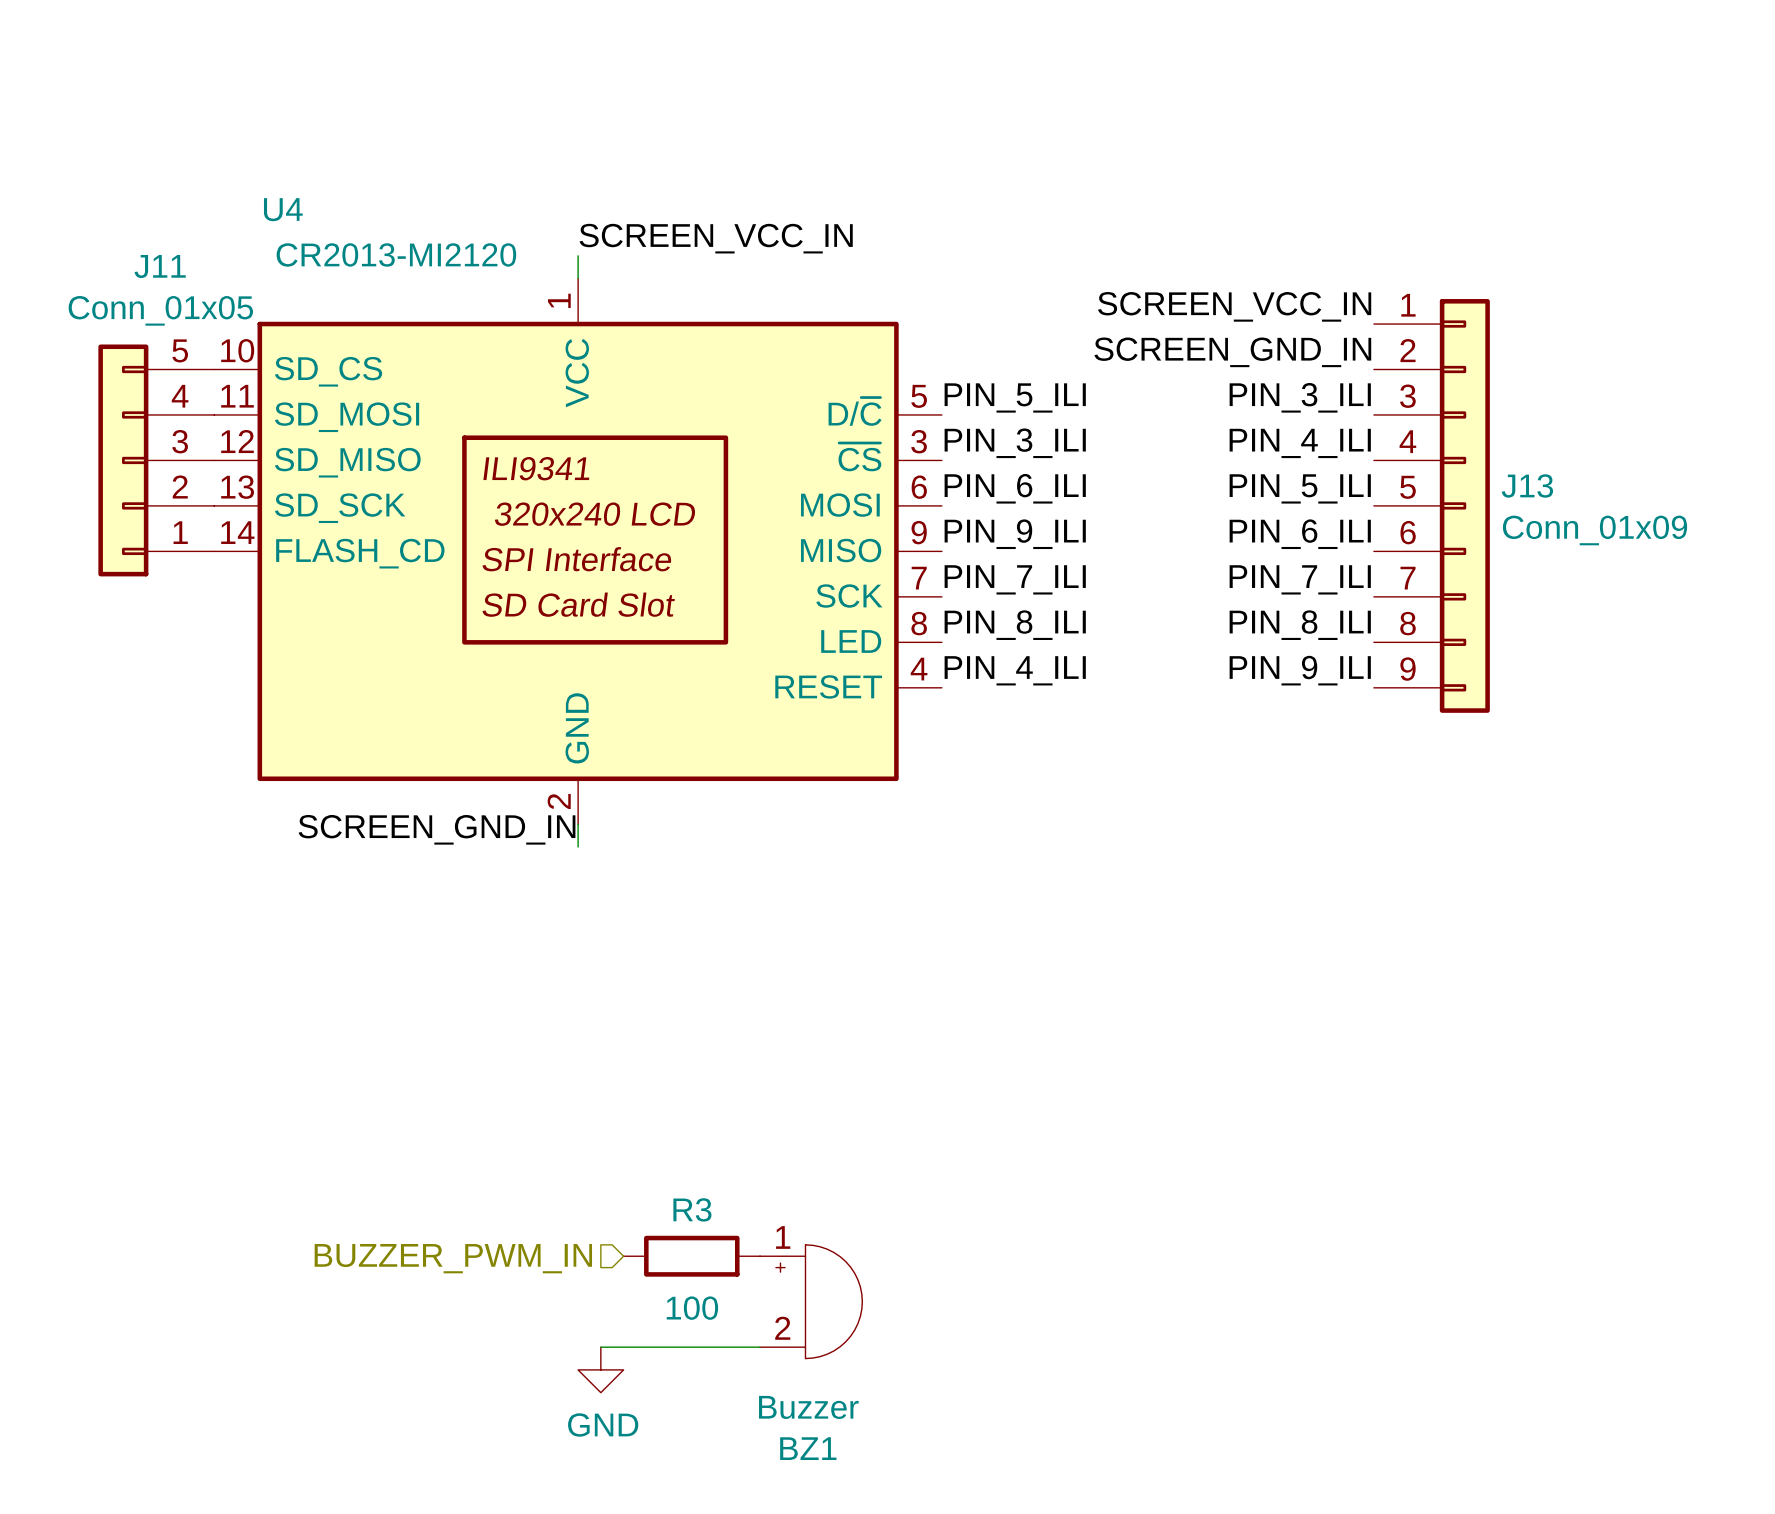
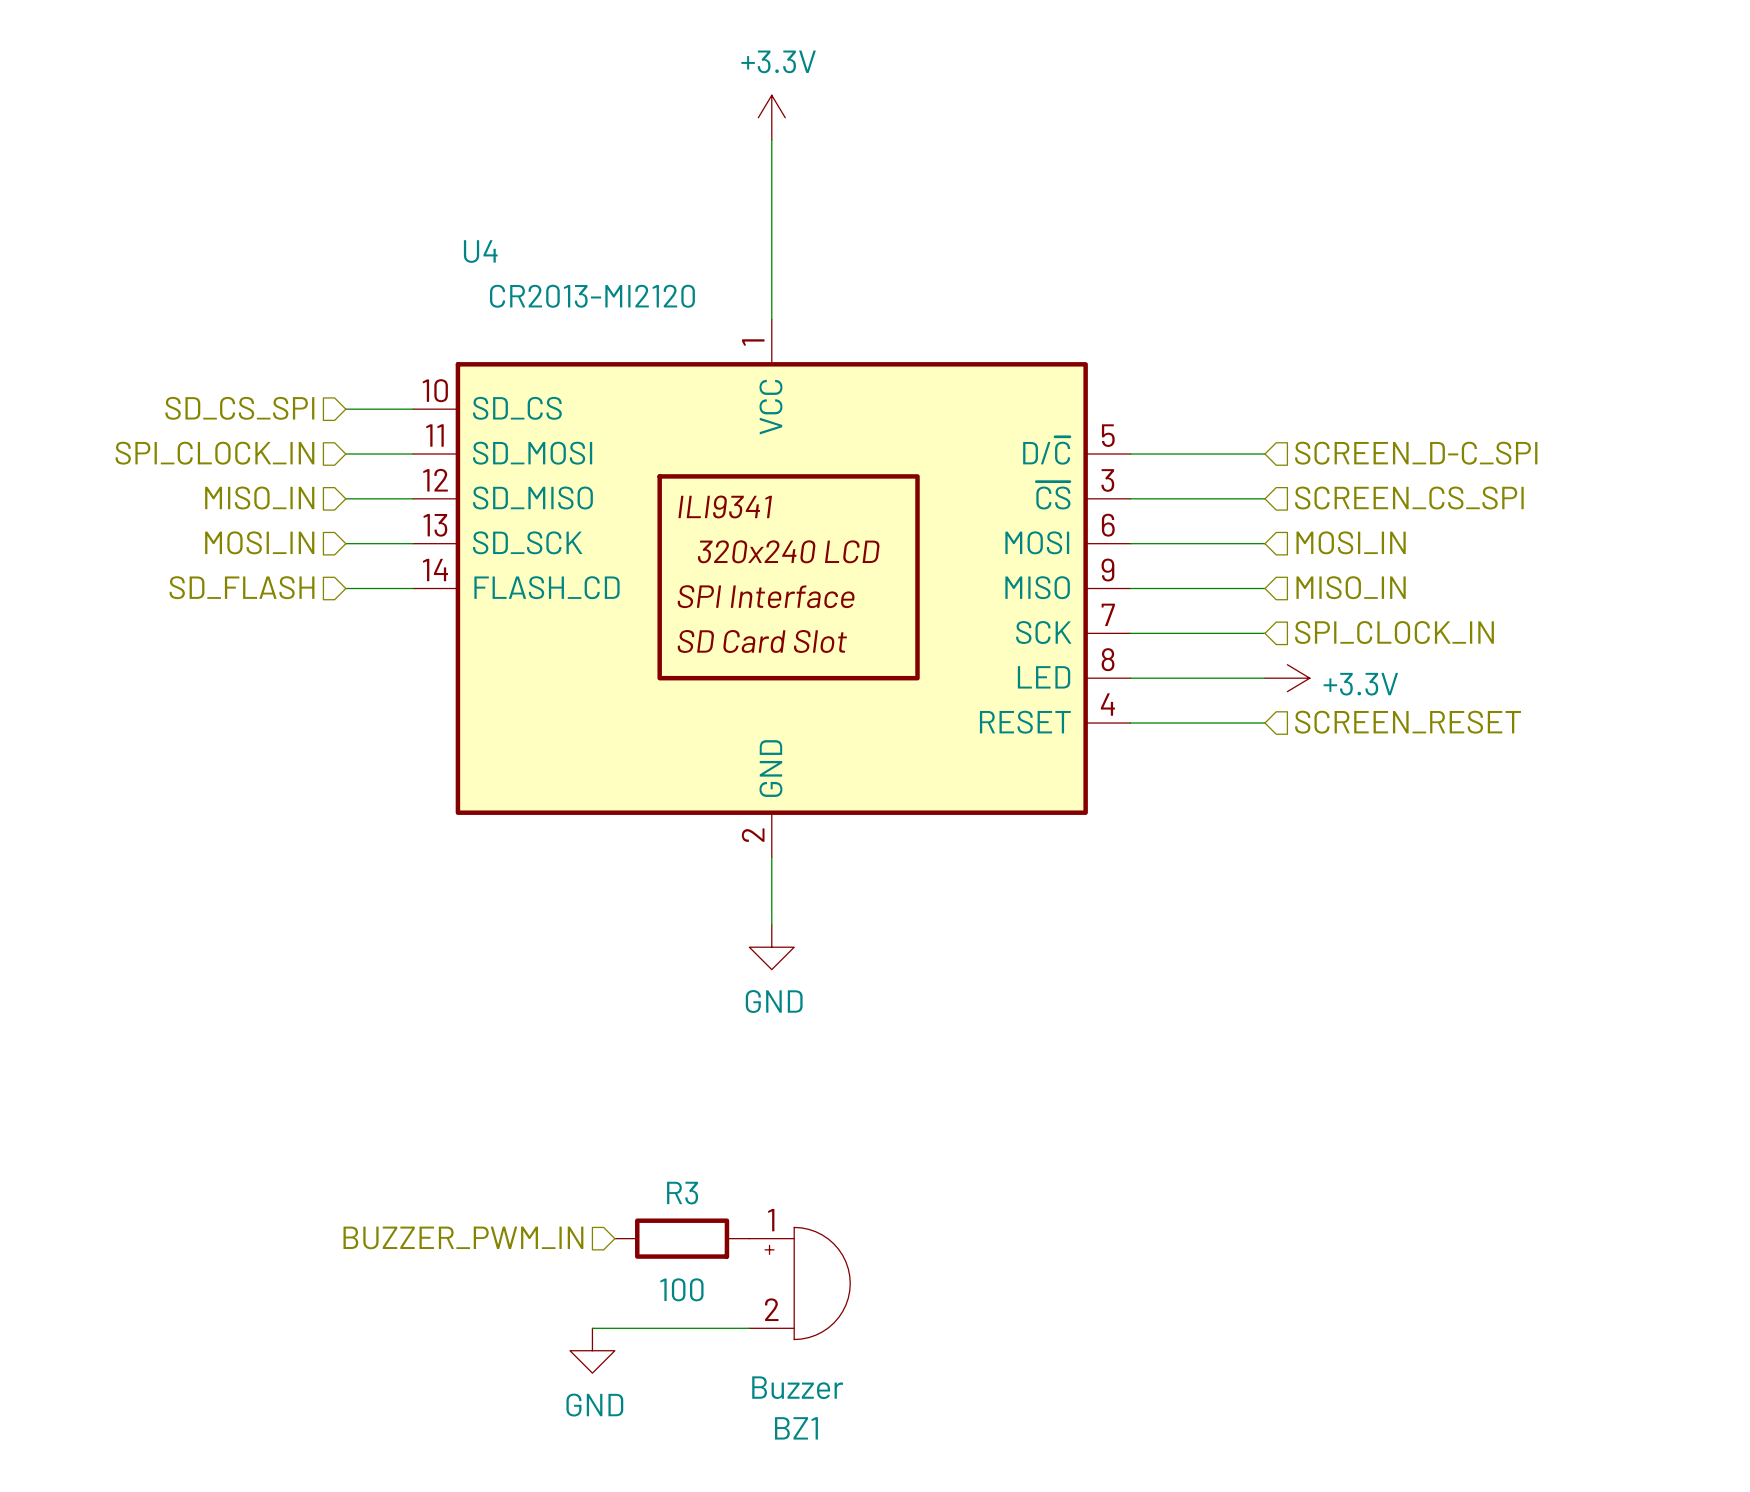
power symbol: none -> +3.3V (771, 117)
wire: none -> (771, 140) (771, 319)
label: SCREEN_VCC_IN (716, 238) -> none
wire: (578, 255) (578, 278) -> none
label: SCREEN_VCC_IN (1234, 306) -> none
label: SCREEN_GND_IN (1232, 352) -> none
label: PIN_5_ILI (1015, 397) -> none
label: PIN_3_ILI (1300, 397) -> none
hierarchical label: none -> SD_CS_SPI (239, 408)
label: PIN_3_ILI (1015, 443) -> none
label: PIN_4_ILI (1300, 443) -> none
J11: Conn_01x05 (156, 460) -> none
wire: none -> (1130, 454) (1264, 454)
hierarchical label: none -> SPI_CLOCK_IN (214, 453)
hierarchical label: none -> SCREEN_D-C_SPI (1416, 453)
label: PIN_6_ILI (1015, 488) -> none
label: PIN_5_ILI (1300, 488) -> none
wire: none -> (1130, 498) (1264, 498)
J13: Conn_01x09 (1431, 505) -> none
hierarchical label: none -> MISO_IN (259, 498)
hierarchical label: none -> SCREEN_CS_SPI (1409, 498)
label: PIN_9_ILI (1015, 534) -> none
label: PIN_6_ILI (1300, 534) -> none
U4 position: (578, 551) -> (771, 588)
wire: none -> (1130, 543) (1264, 543)
hierarchical label: none -> MOSI_IN (259, 542)
hierarchical label: none -> MOSI_IN (1351, 542)
label: PIN_7_ILI (1015, 579) -> none
label: PIN_7_ILI (1300, 579) -> none
wire: none -> (1130, 588) (1264, 588)
hierarchical label: none -> SD_FLASH (242, 587)
hierarchical label: none -> MISO_IN (1351, 587)
label: PIN_8_ILI (1015, 625) -> none
label: PIN_8_ILI (1300, 625) -> none
wire: none -> (1130, 633) (1264, 633)
hierarchical label: none -> SPI_CLOCK_IN (1394, 632)
label: PIN_4_ILI (1015, 670) -> none
label: PIN_9_ILI (1300, 670) -> none
wire: none -> (1130, 678) (1264, 678)
power symbol: none -> +3.3V (1287, 678)
wire: none -> (1130, 723) (1264, 723)
hierarchical label: none -> SCREEN_RESET (1408, 722)
wire: (578, 824) (578, 846) -> none
label: SCREEN_GND_IN (437, 829) -> none
wire: none -> (771, 857) (771, 924)
power symbol: none -> GND (771, 947)

